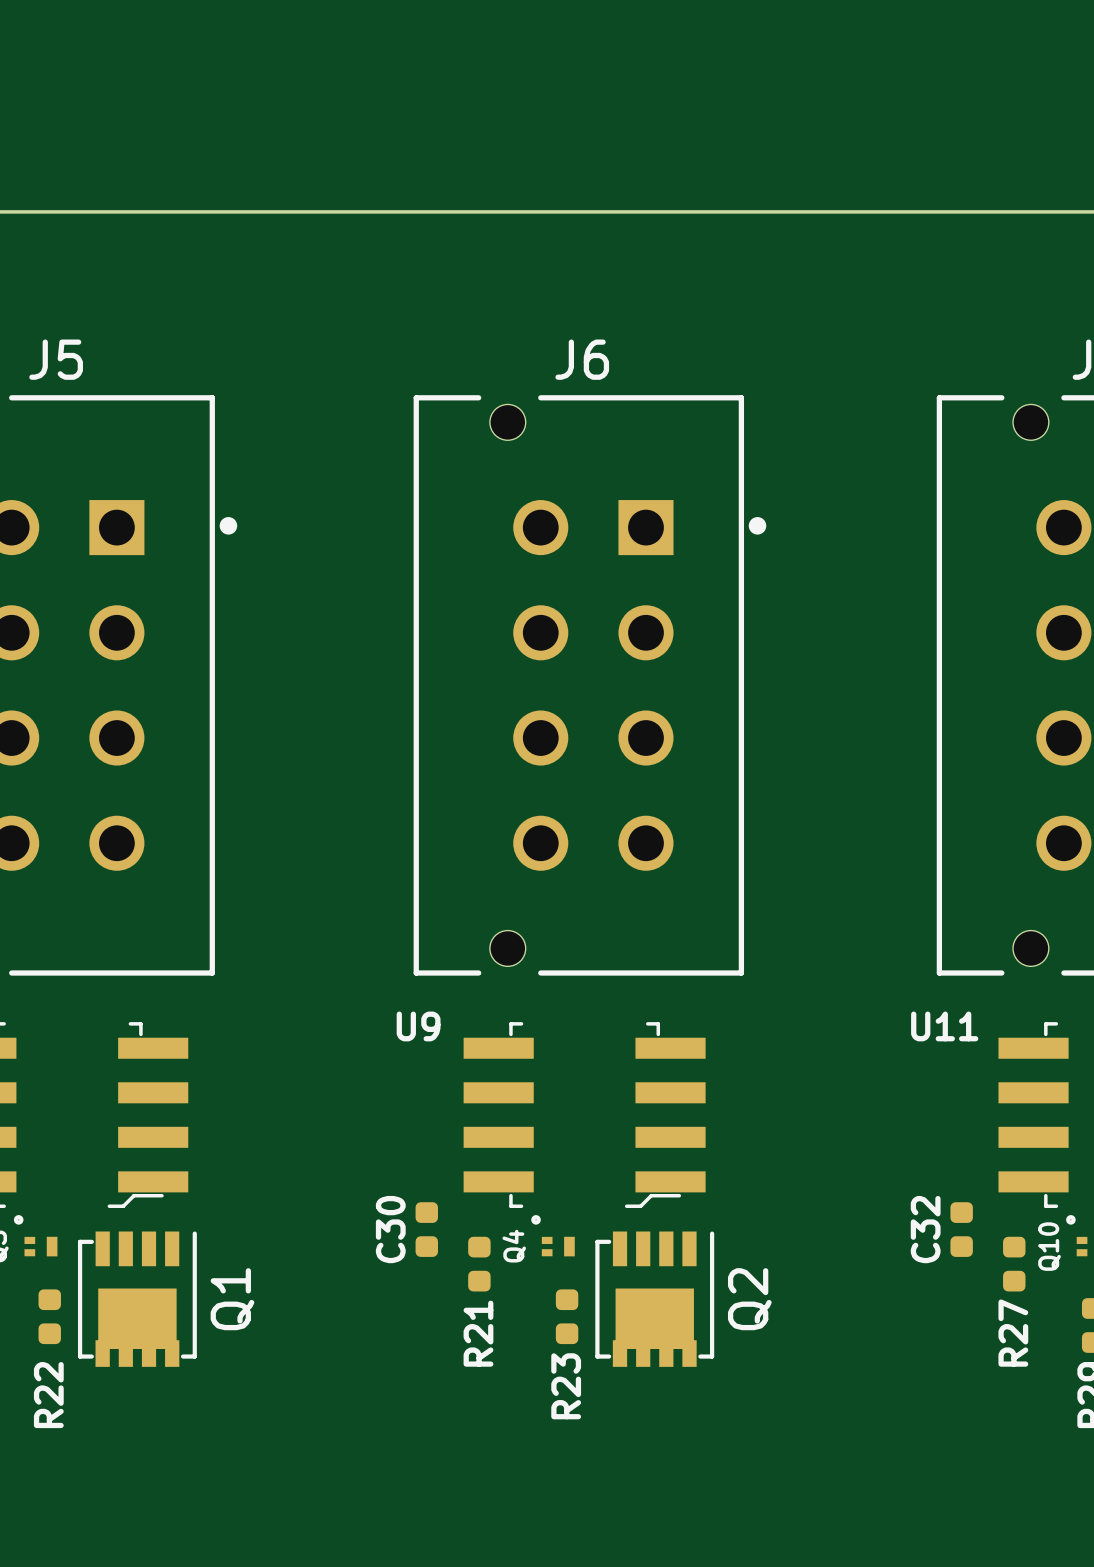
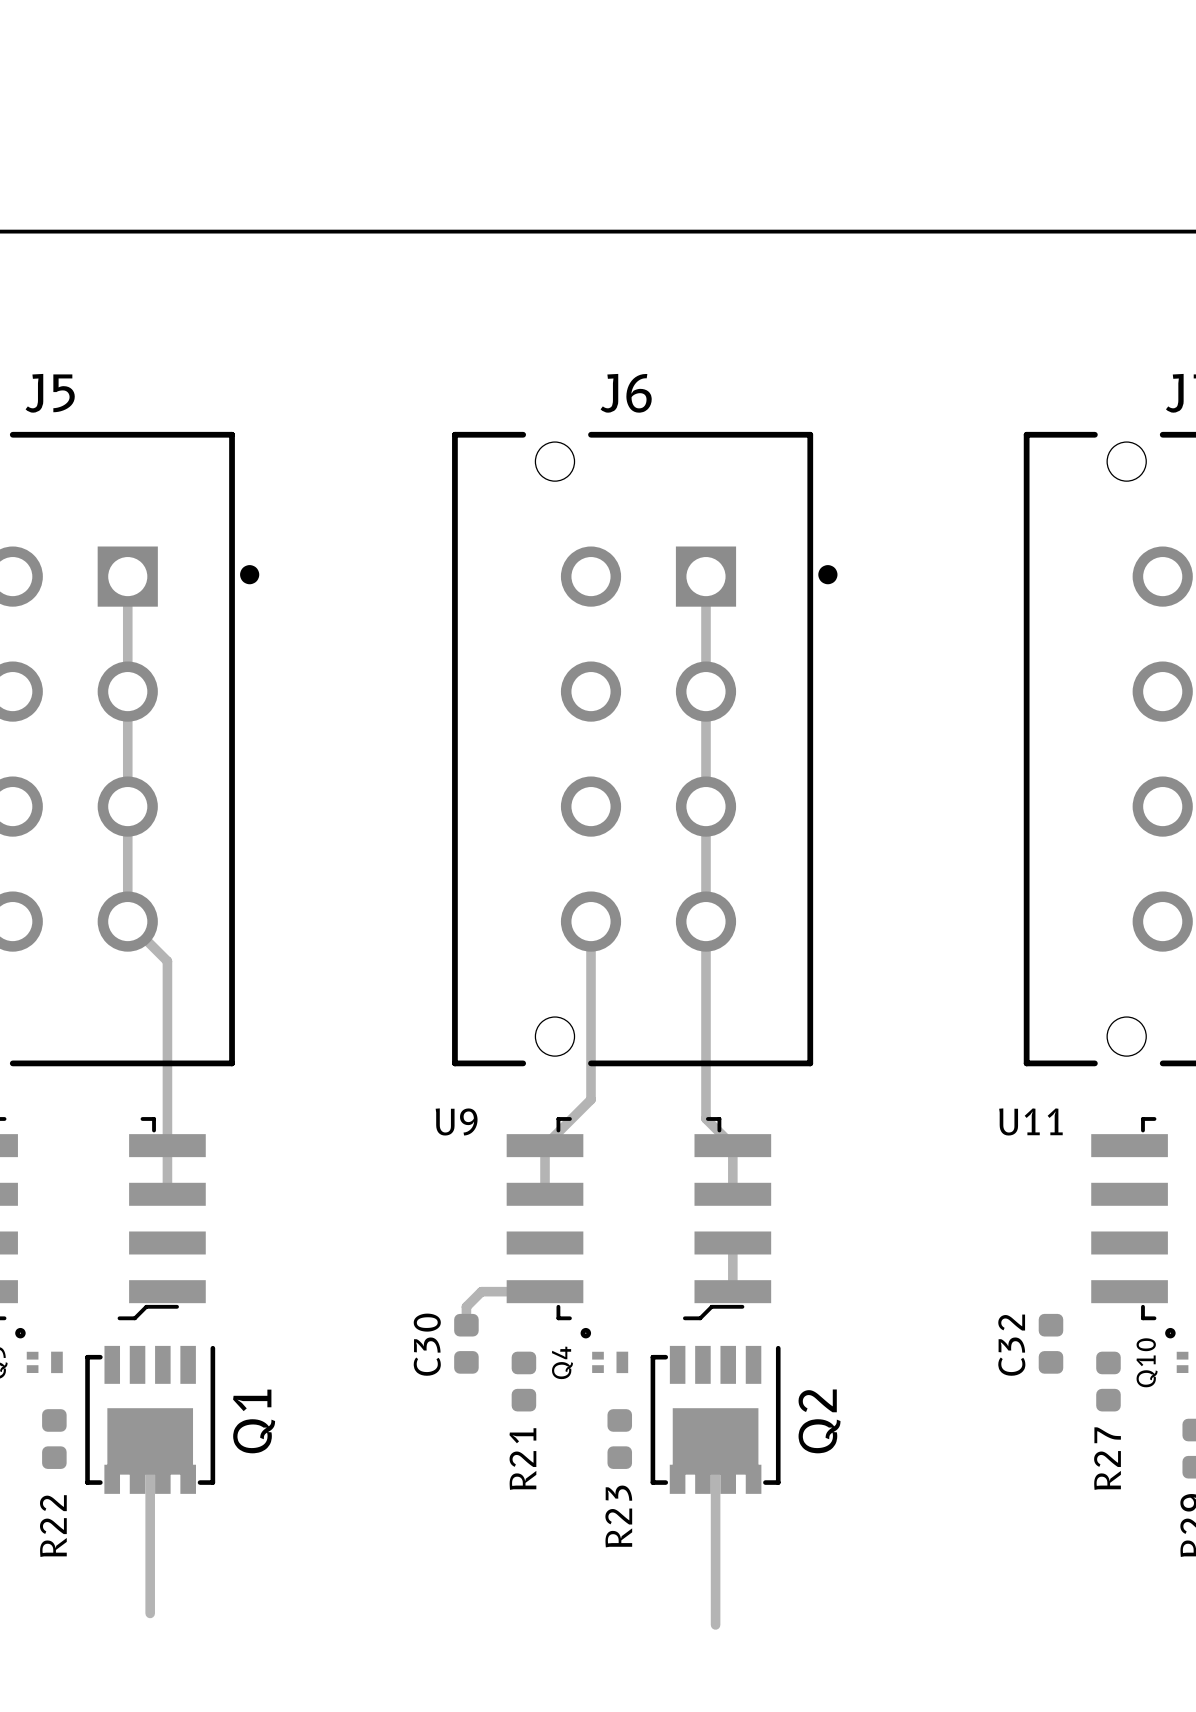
track: none -> (127, 576) (127, 921) (167, 961) (167, 1194)
track: none -> (706, 576) (706, 1118) (732, 1145) (732, 1194)
track: none -> (591, 921) (591, 1099) (545, 1145) (545, 1194)
track: none -> (732, 1242) (732, 1291)
track: none -> (545, 1291) (481, 1291) (466, 1306) (466, 1325)
track: none -> (150, 1441) (150, 1613)
track: none -> (715, 1441) (715, 1624)

